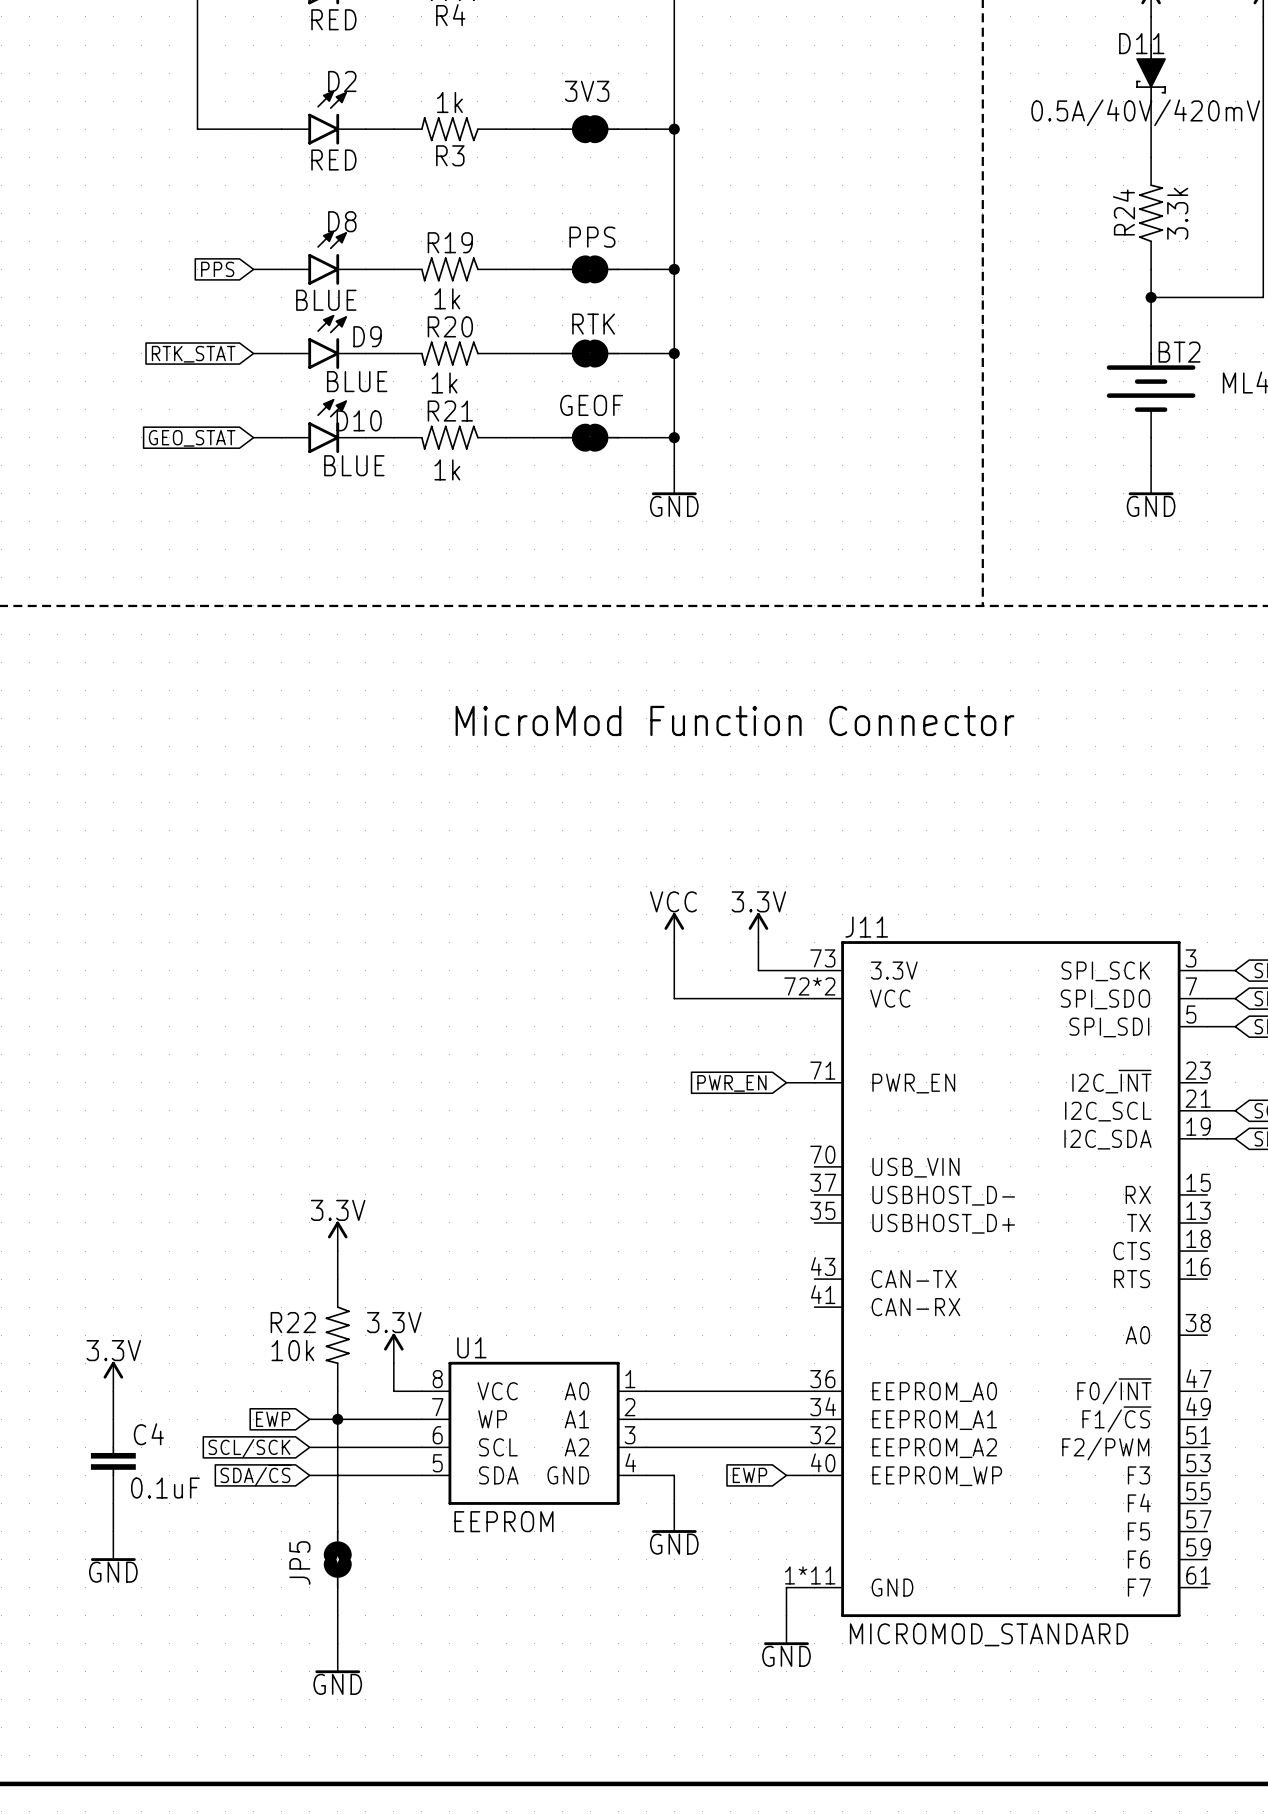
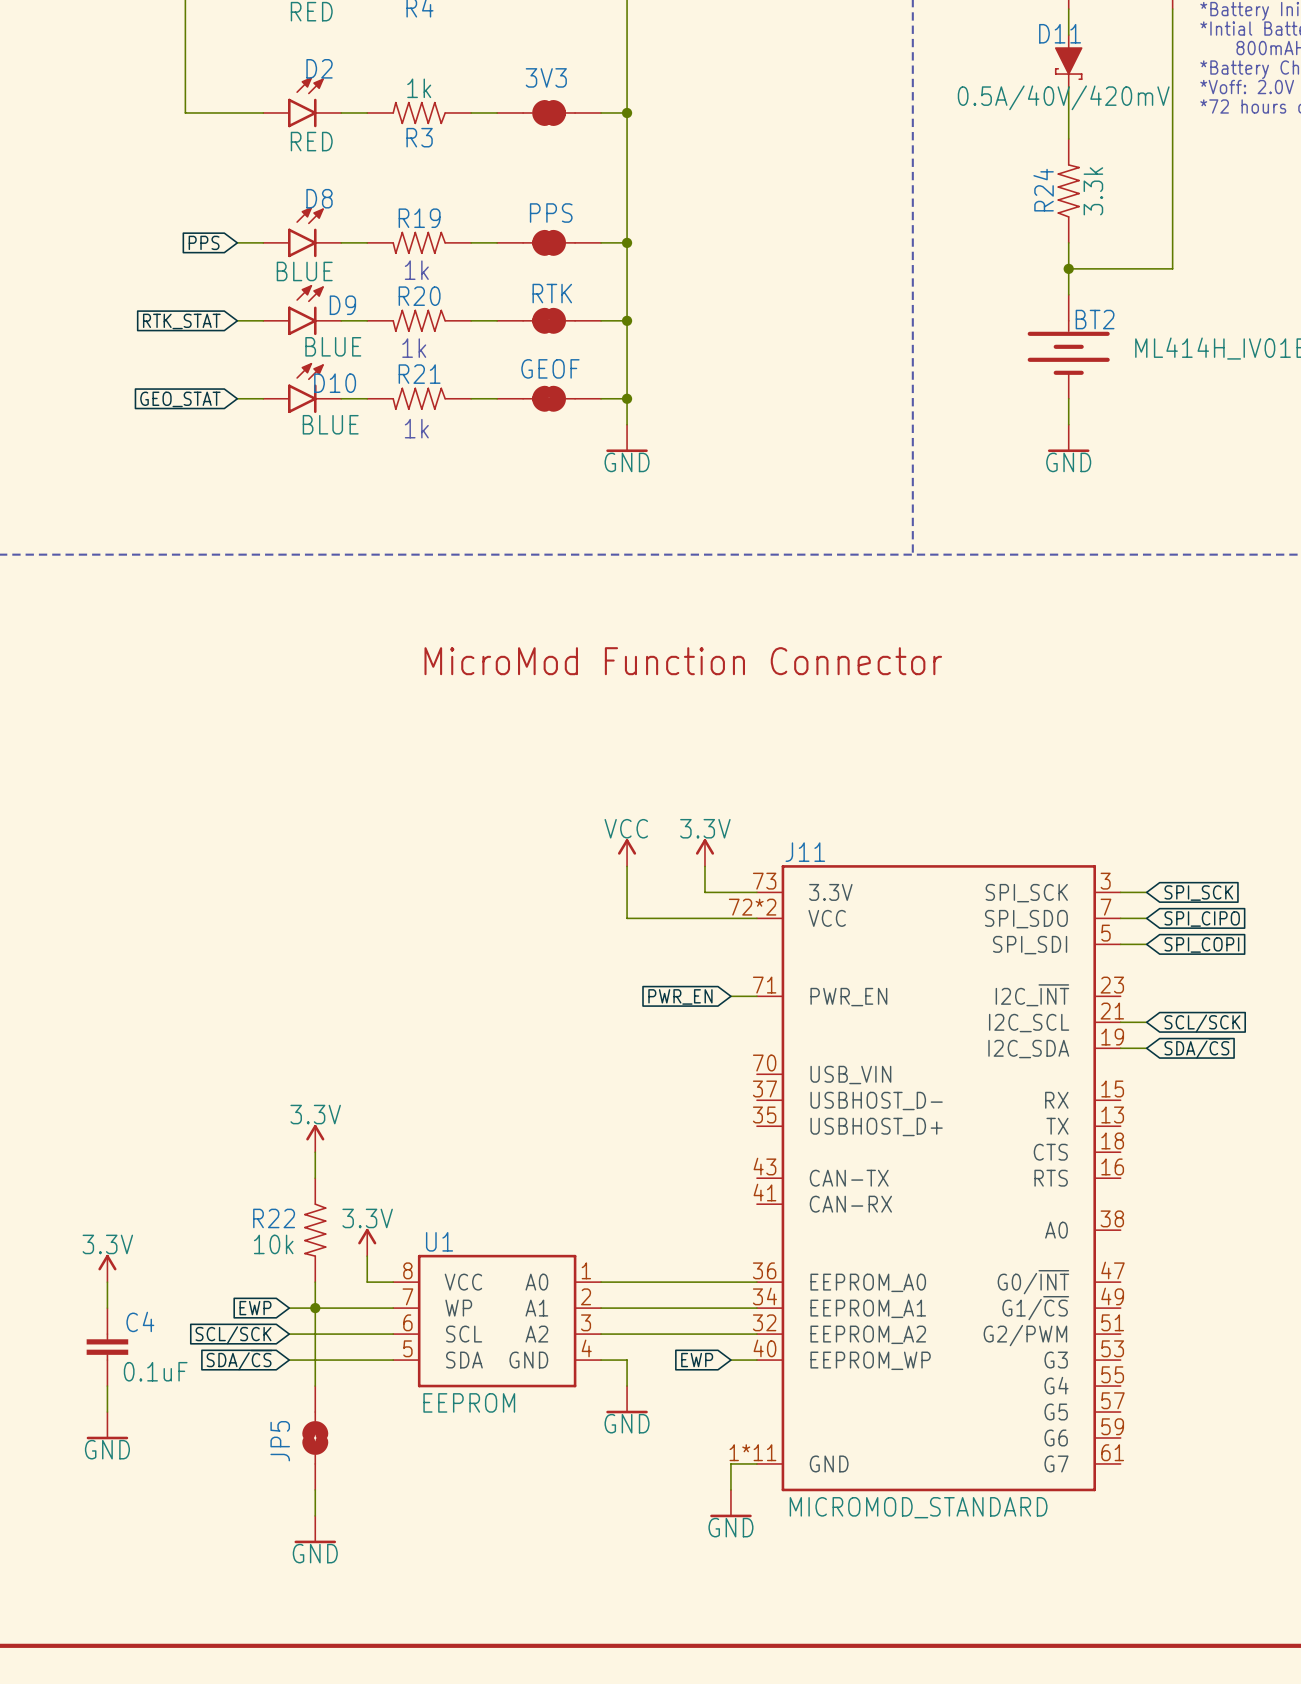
J11 pin name: F0/~{INT} (1114, 1391) -> G0/~{INT} (1033, 1282)
J11 pin name: F1/~{CS} (1116, 1419) -> G1/~{CS} (1035, 1308)
J11 pin name: F2/PWM (1105, 1448) -> G2/PWM (1025, 1335)
J11 pin name: F3 (1138, 1475) -> G3 (1056, 1360)
J11 pin name: F4 (1139, 1503) -> G4 (1056, 1385)
J11 pin name: F5 (1138, 1531) -> G5 (1056, 1412)
J11 pin name: F6 (1138, 1559) -> G6 (1056, 1437)
J11 pin name: F7 (1139, 1587) -> G7 (1056, 1463)

